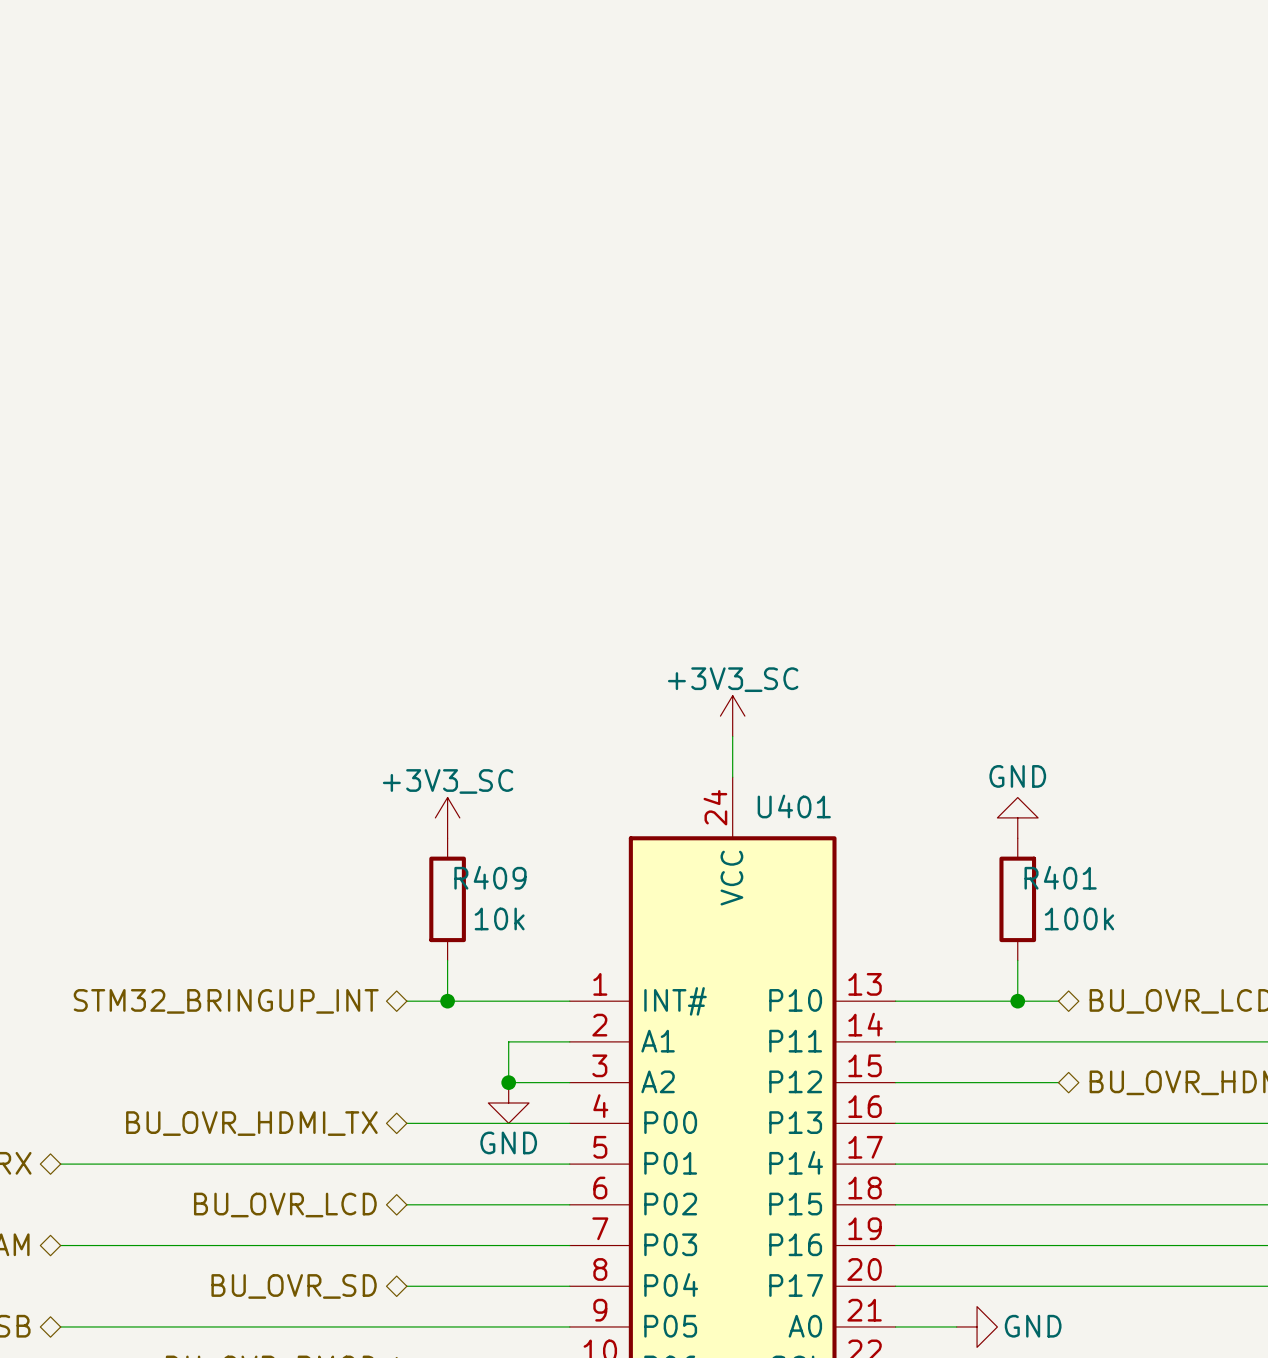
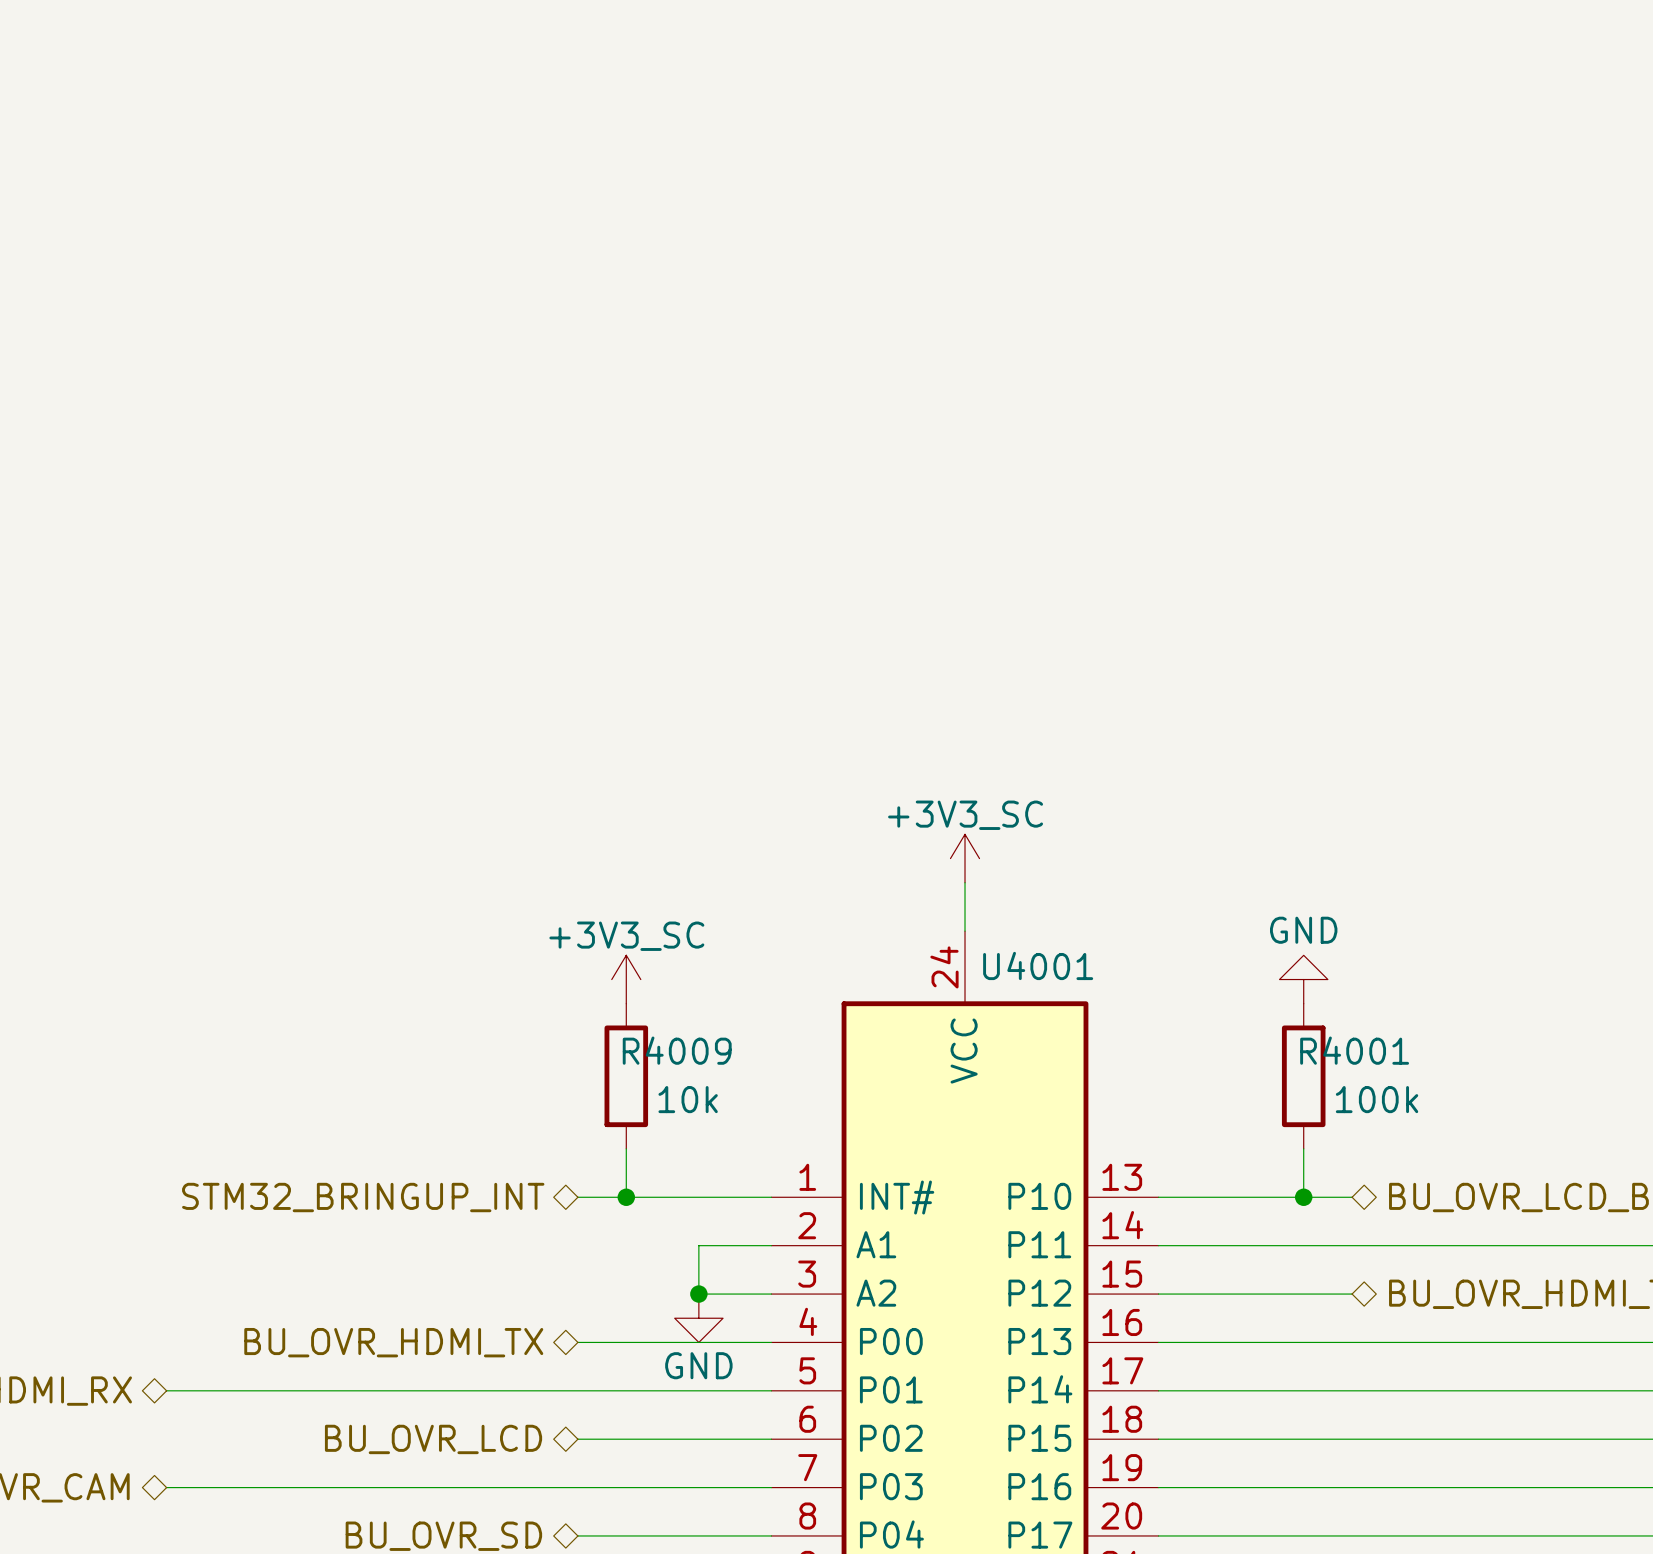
U401 name: U401 (794, 806) -> U4001 (1038, 965)
R409 name: R409 (490, 877) -> R4009 (677, 1050)
R401 name: R401 (1060, 877) -> R4001 (1354, 1050)

